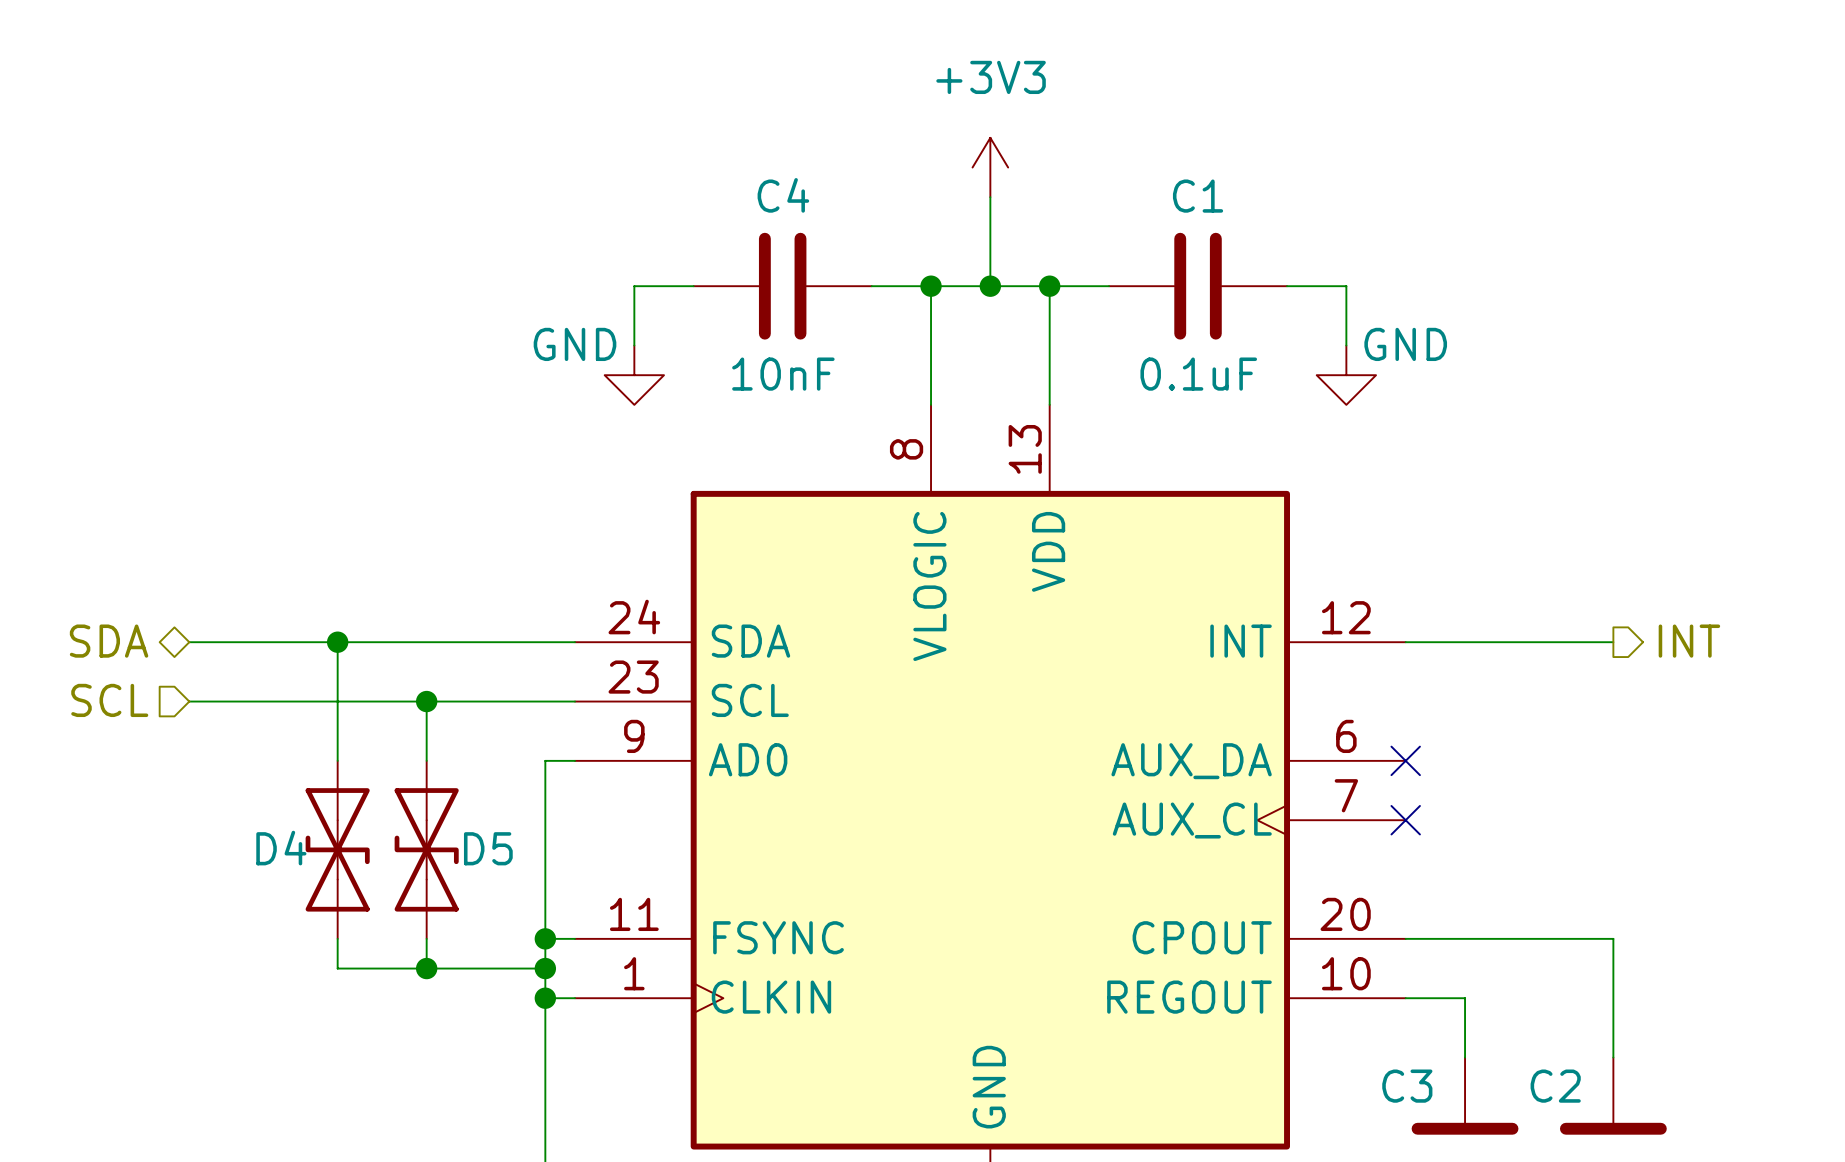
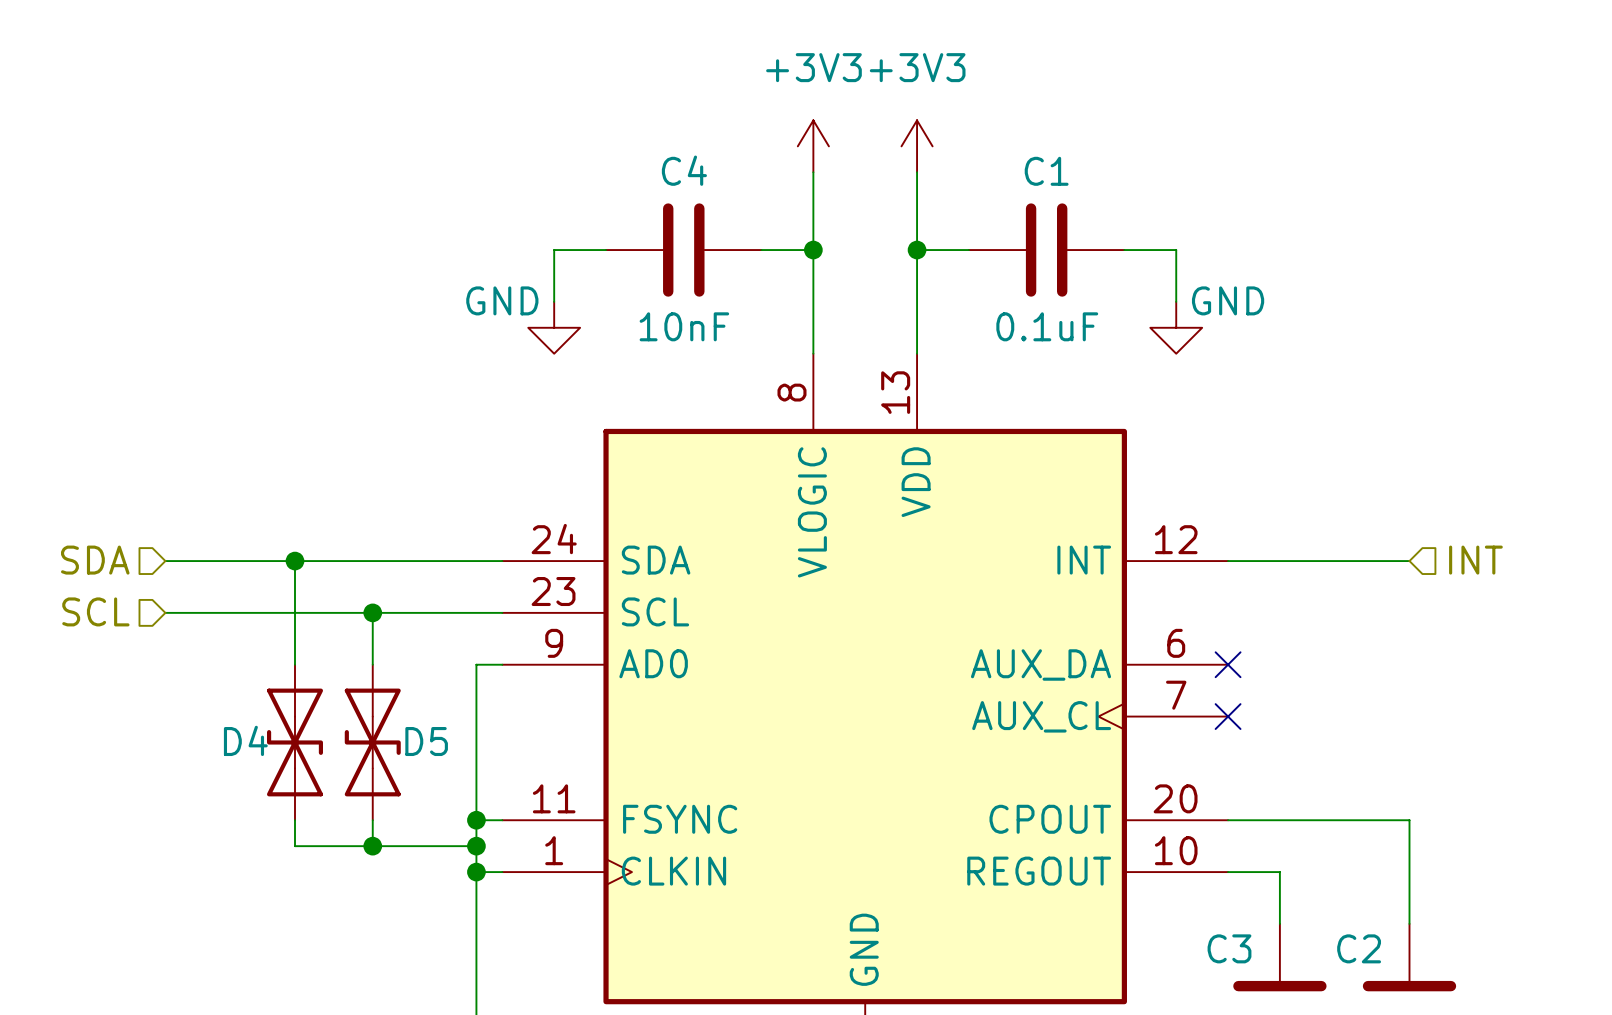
power symbol: none -> +3V3 (813, 146)
power symbol: +3V3 (990, 167) -> none
power symbol: none -> +3V3 (917, 146)
wire: (990, 197) (990, 286) -> (917, 172) (917, 250)
wire: (931, 286) (1049, 286) -> (813, 250) (813, 172)
junction: (990, 286) -> none
hierarchical label shape: bidirectional (109, 641) -> input (95, 560)
hierarchical label shape: output (1689, 641) -> input (1475, 560)

